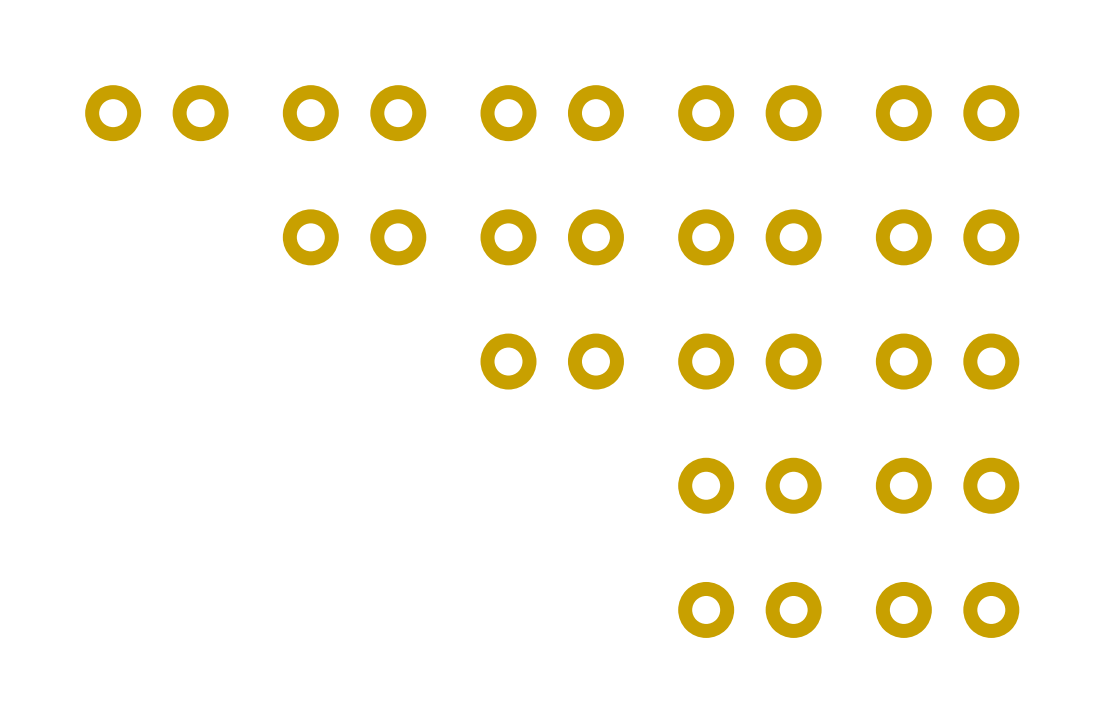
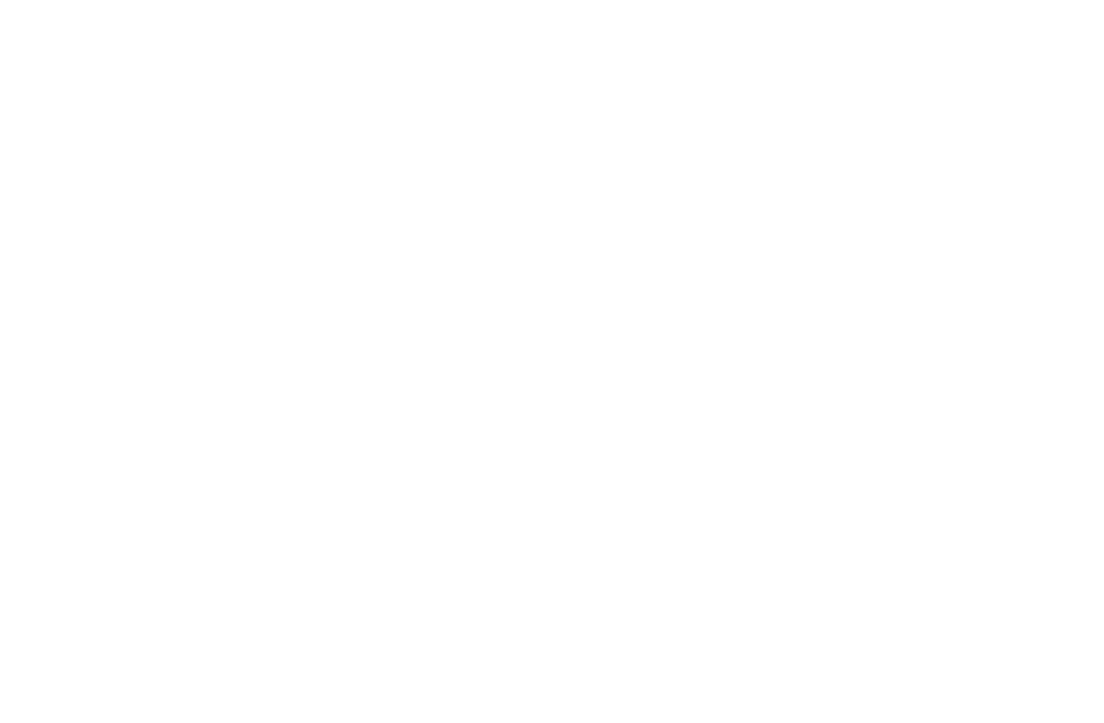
part: (156, 113) -> none
part: (354, 113) -> none
part: (552, 113) -> none
part: (749, 113) -> none
part: (947, 113) -> none
part: (354, 237) -> none
part: (552, 237) -> none
part: (749, 237) -> none
part: (947, 237) -> none
part: (552, 361) -> none
part: (749, 361) -> none
part: (947, 361) -> none
part: (749, 485) -> none
part: (947, 485) -> none
part: (749, 609) -> none
part: (947, 609) -> none

